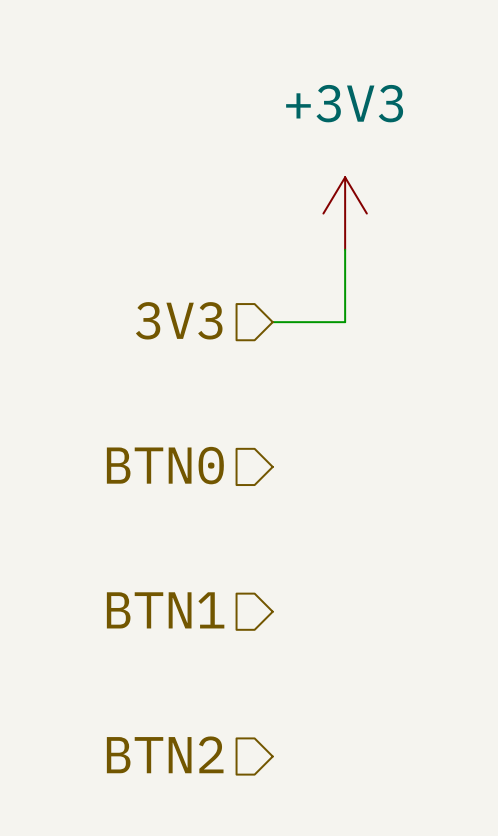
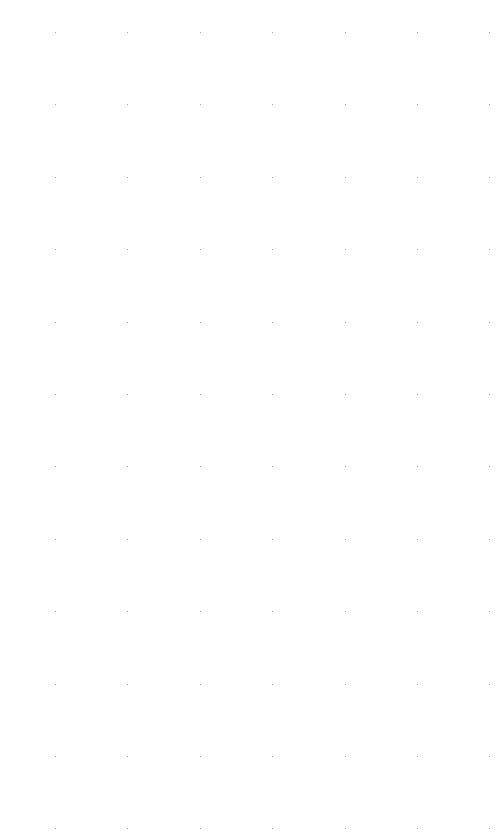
power symbol: +3V3 (345, 213) -> none
wire: (345, 249) (345, 322) (272, 322) -> none
hierarchical label: 3V3 (179, 320) -> none
hierarchical label: BTN0 (165, 465) -> none
hierarchical label: BTN1 (165, 610) -> none
hierarchical label: BTN2 (165, 754) -> none

